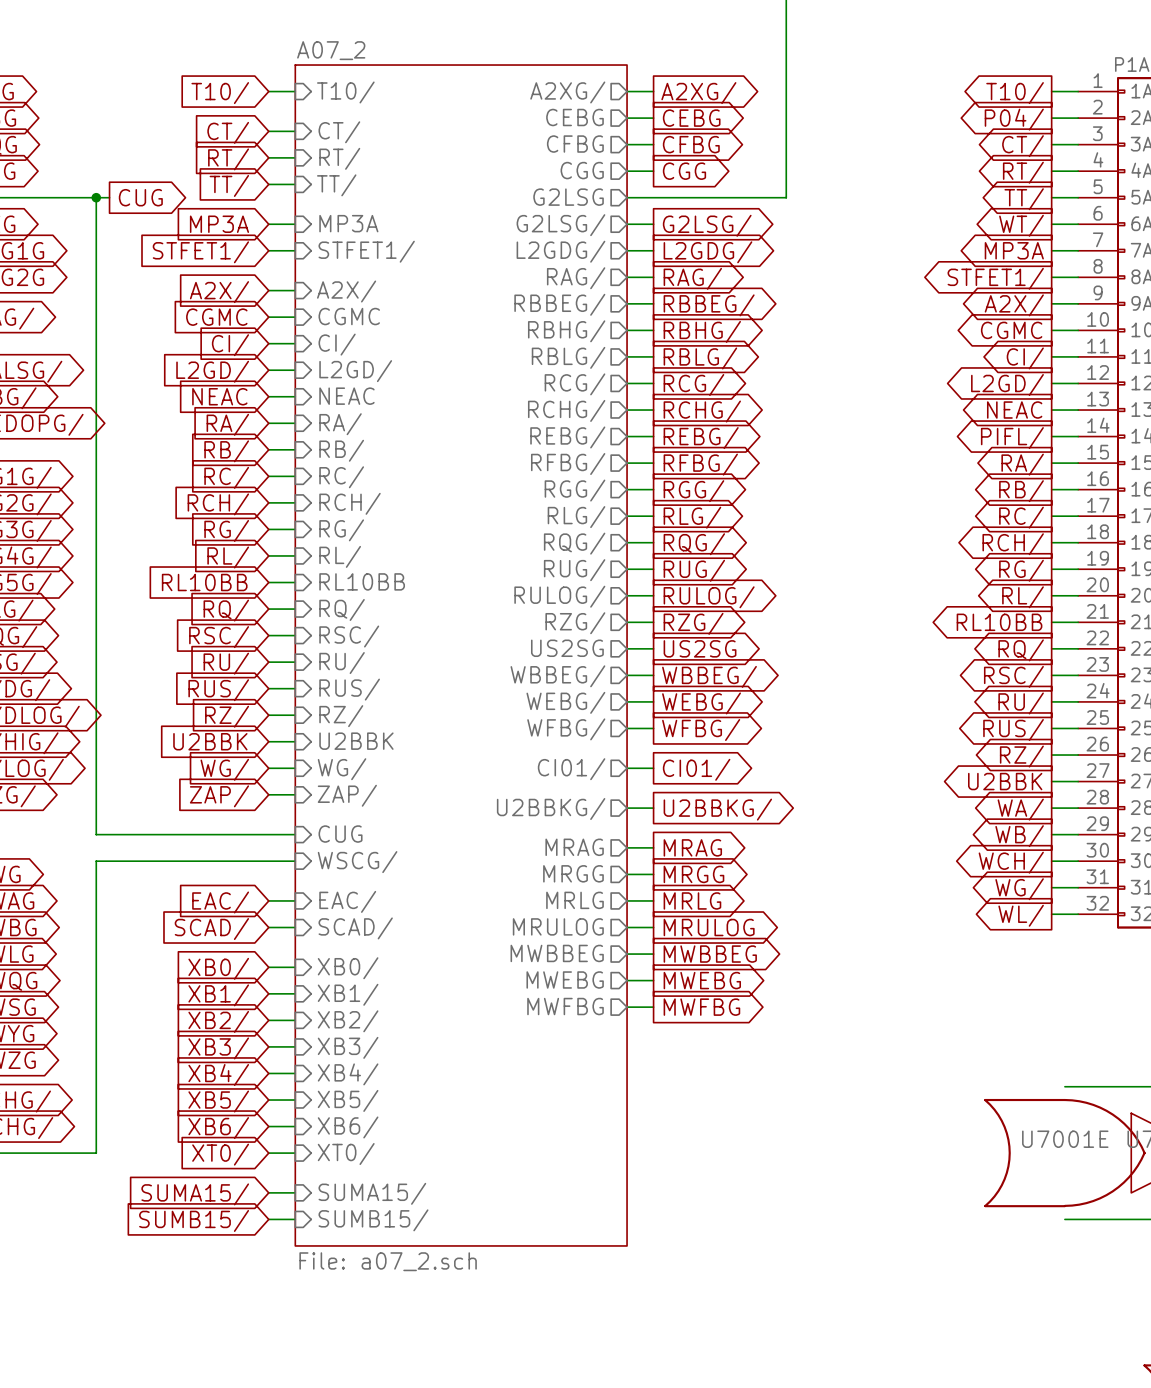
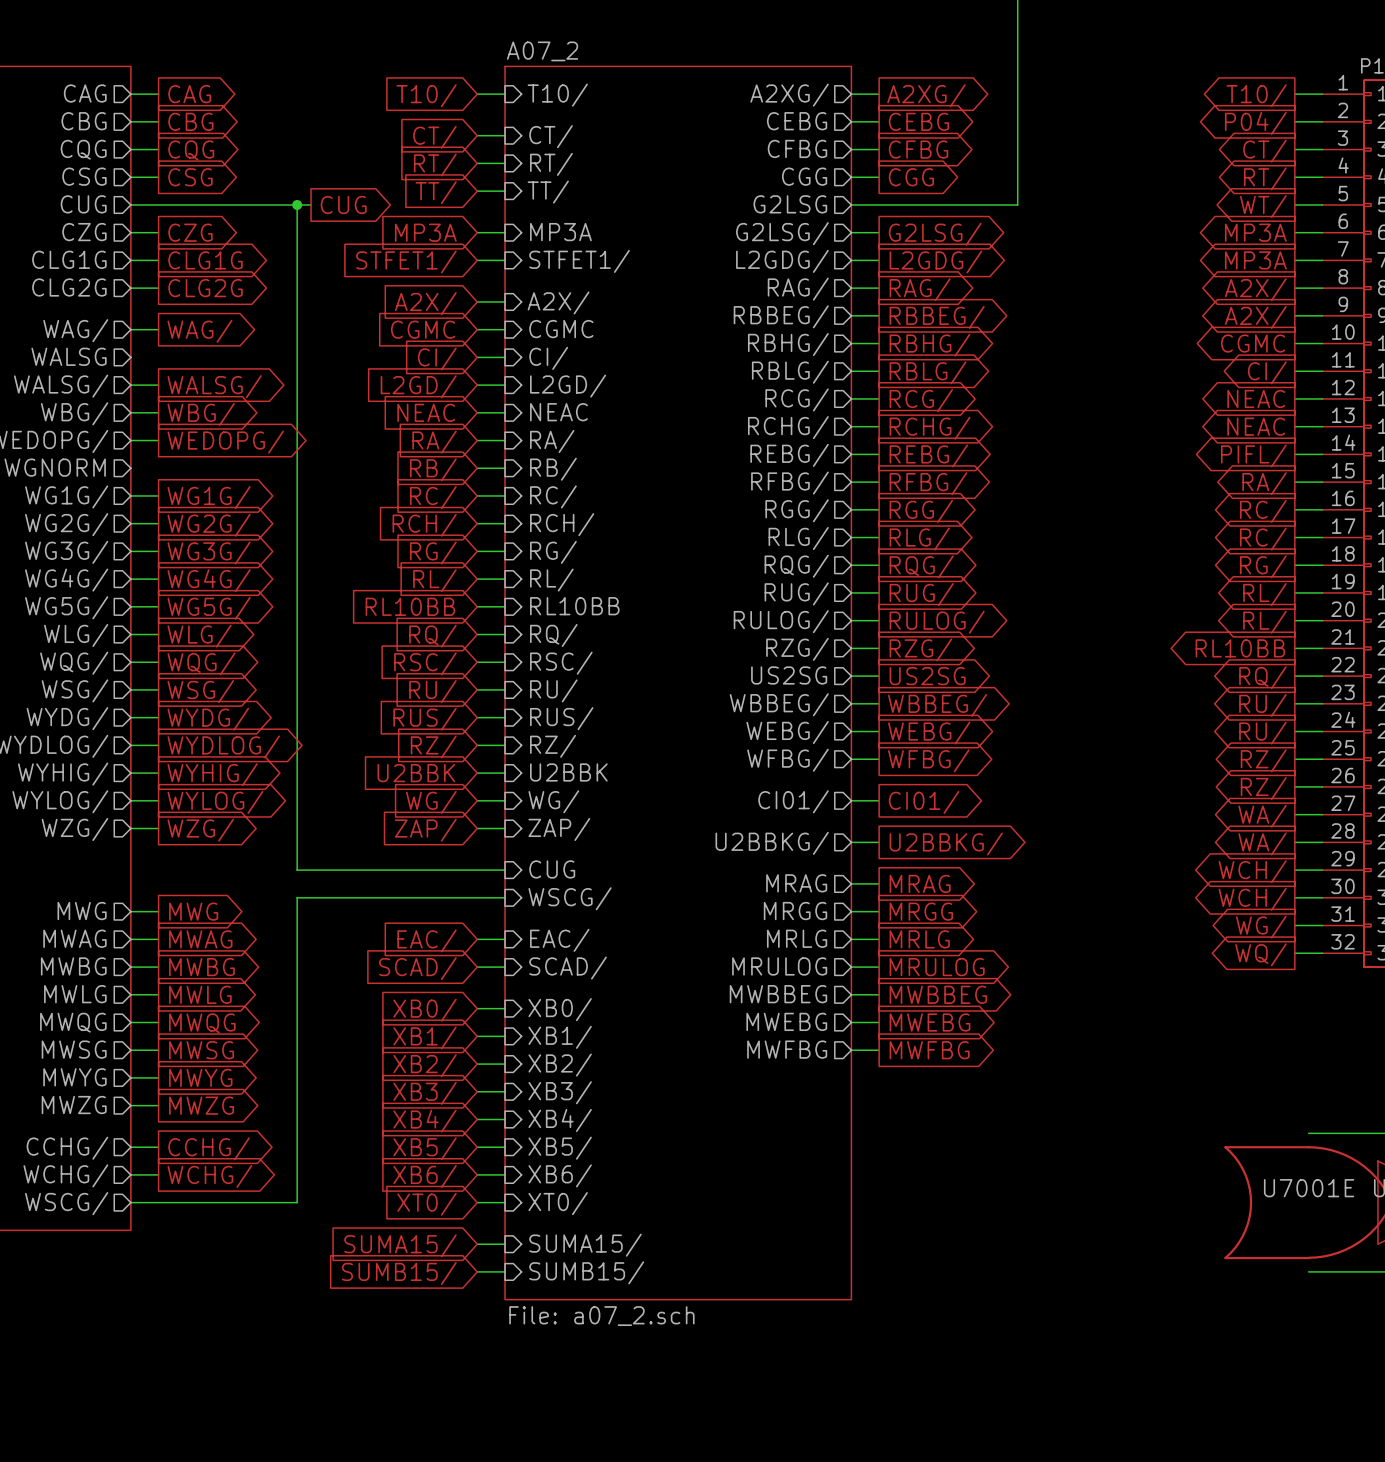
global label: TT/ (1024, 199) -> WT/ (1263, 206)
global label: WT/ (1021, 225) -> MP3A (1255, 232)
global label: STFET1/ (995, 278) -> A2X/ (1255, 289)
global label: L2GD/ (1007, 384) -> NEAC (1256, 398)
global label: RB/ (1021, 491) -> RC/ (1263, 511)
global label: RCH/ (1013, 544) -> RG/ (1263, 566)
global label: RG/ (1021, 570) -> RL/ (1264, 594)
global label: RSC/ (1013, 676) -> RU/ (1262, 705)
global label: RUS/ (1013, 729) -> RZ/ (1263, 760)
global label: U2BBK (1005, 781) -> WA/ (1262, 816)
global label: WB/ (1019, 836) -> WCH/ (1252, 871)
global label: WL/ (1021, 915) -> WQ/ (1260, 954)

